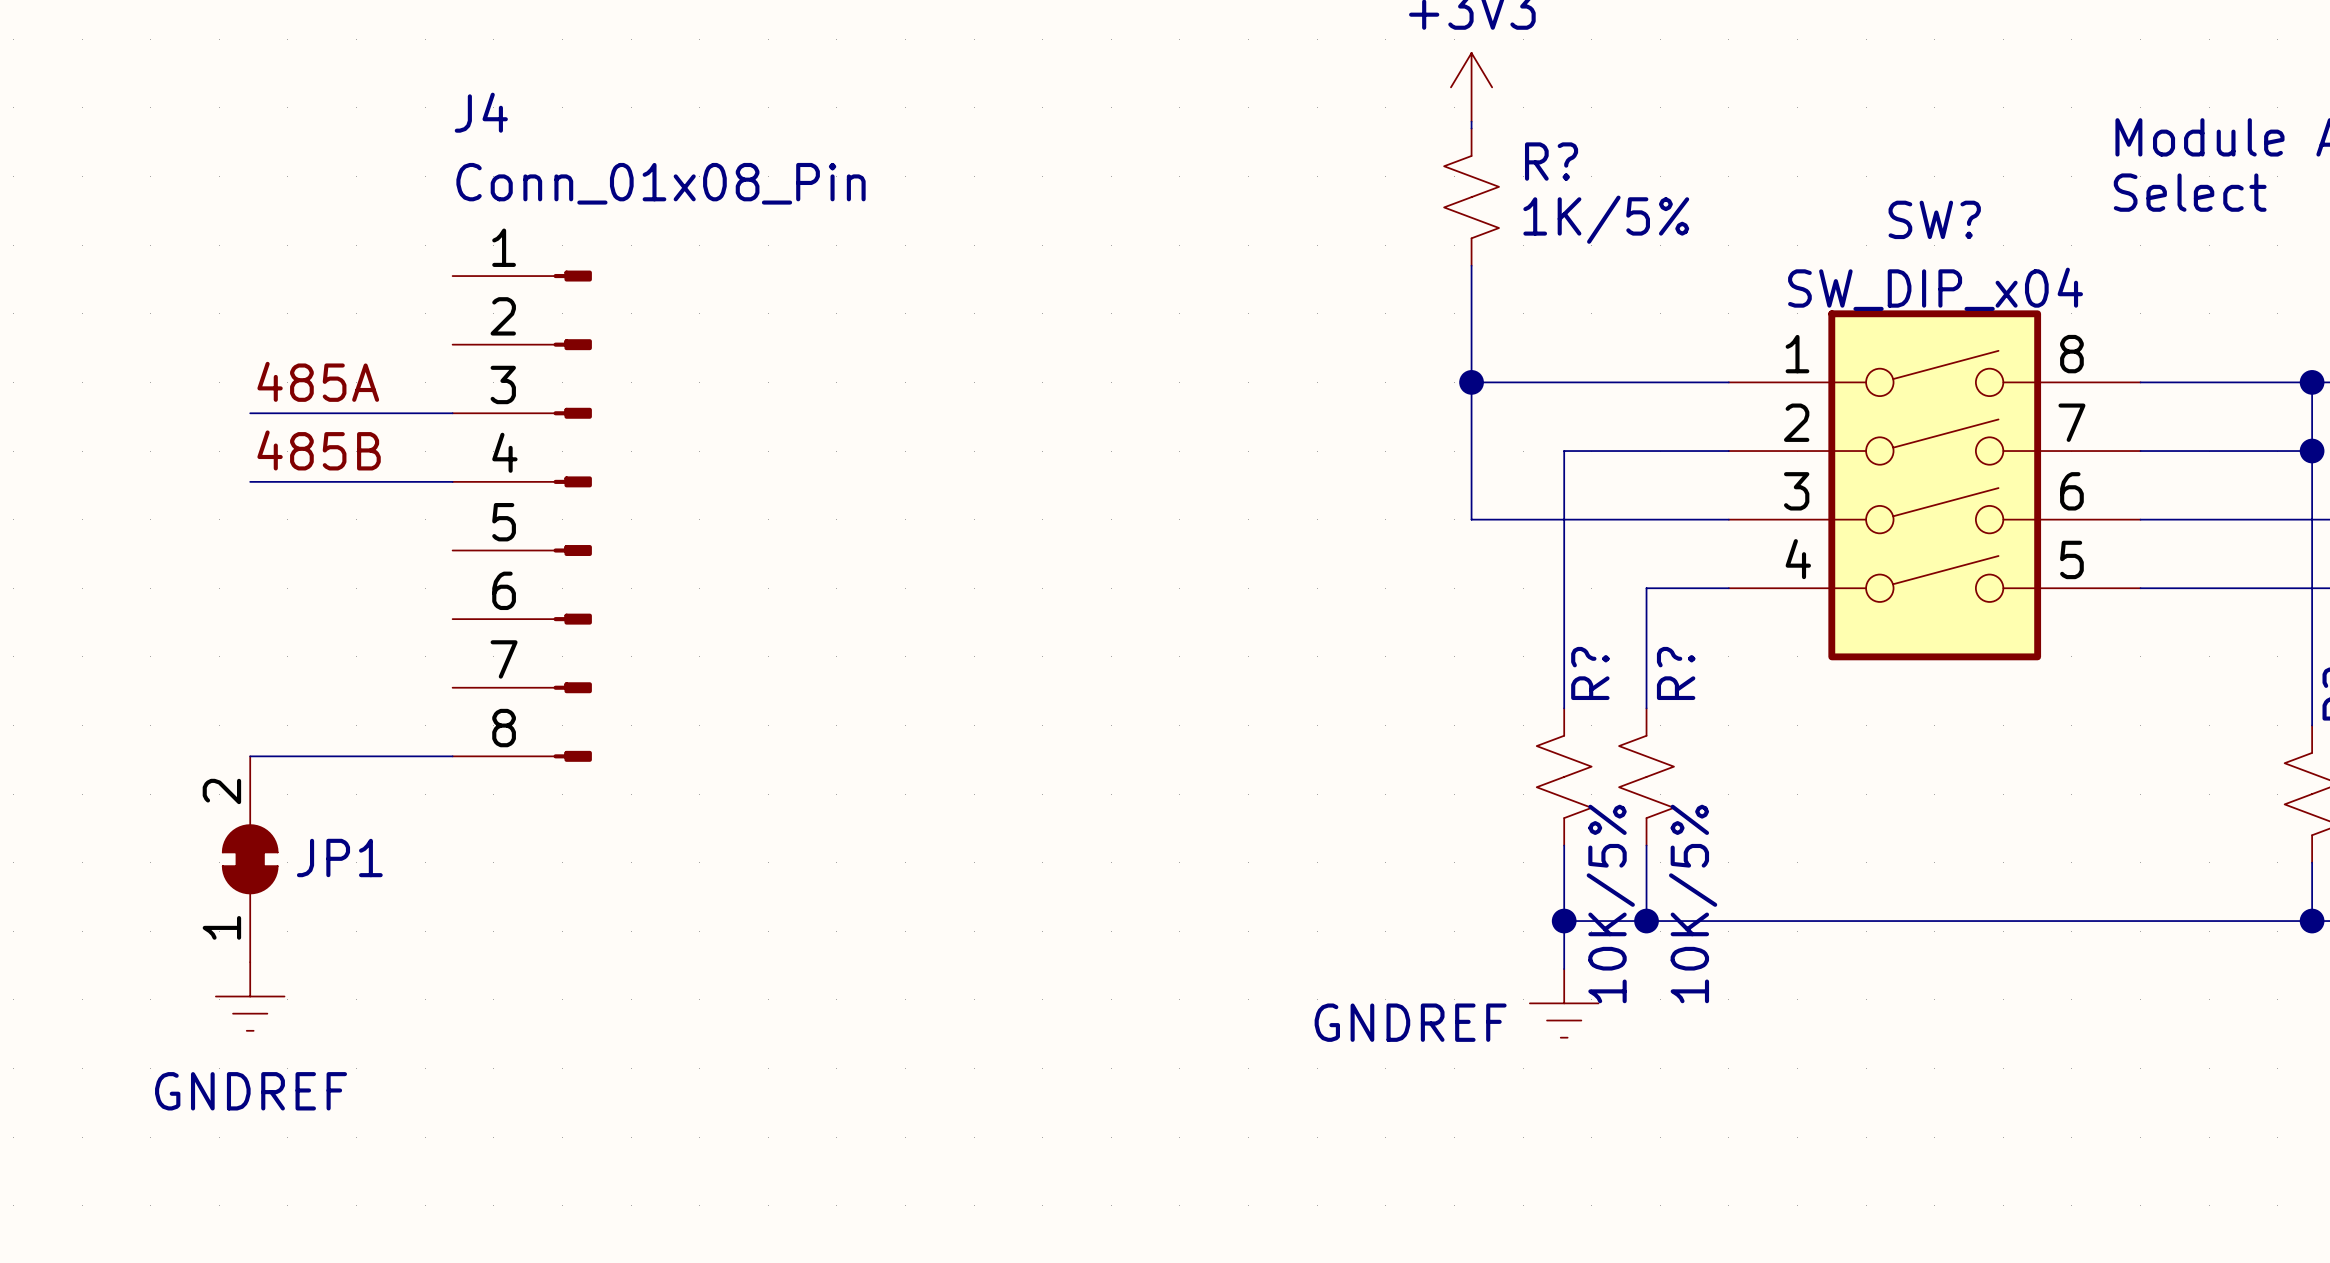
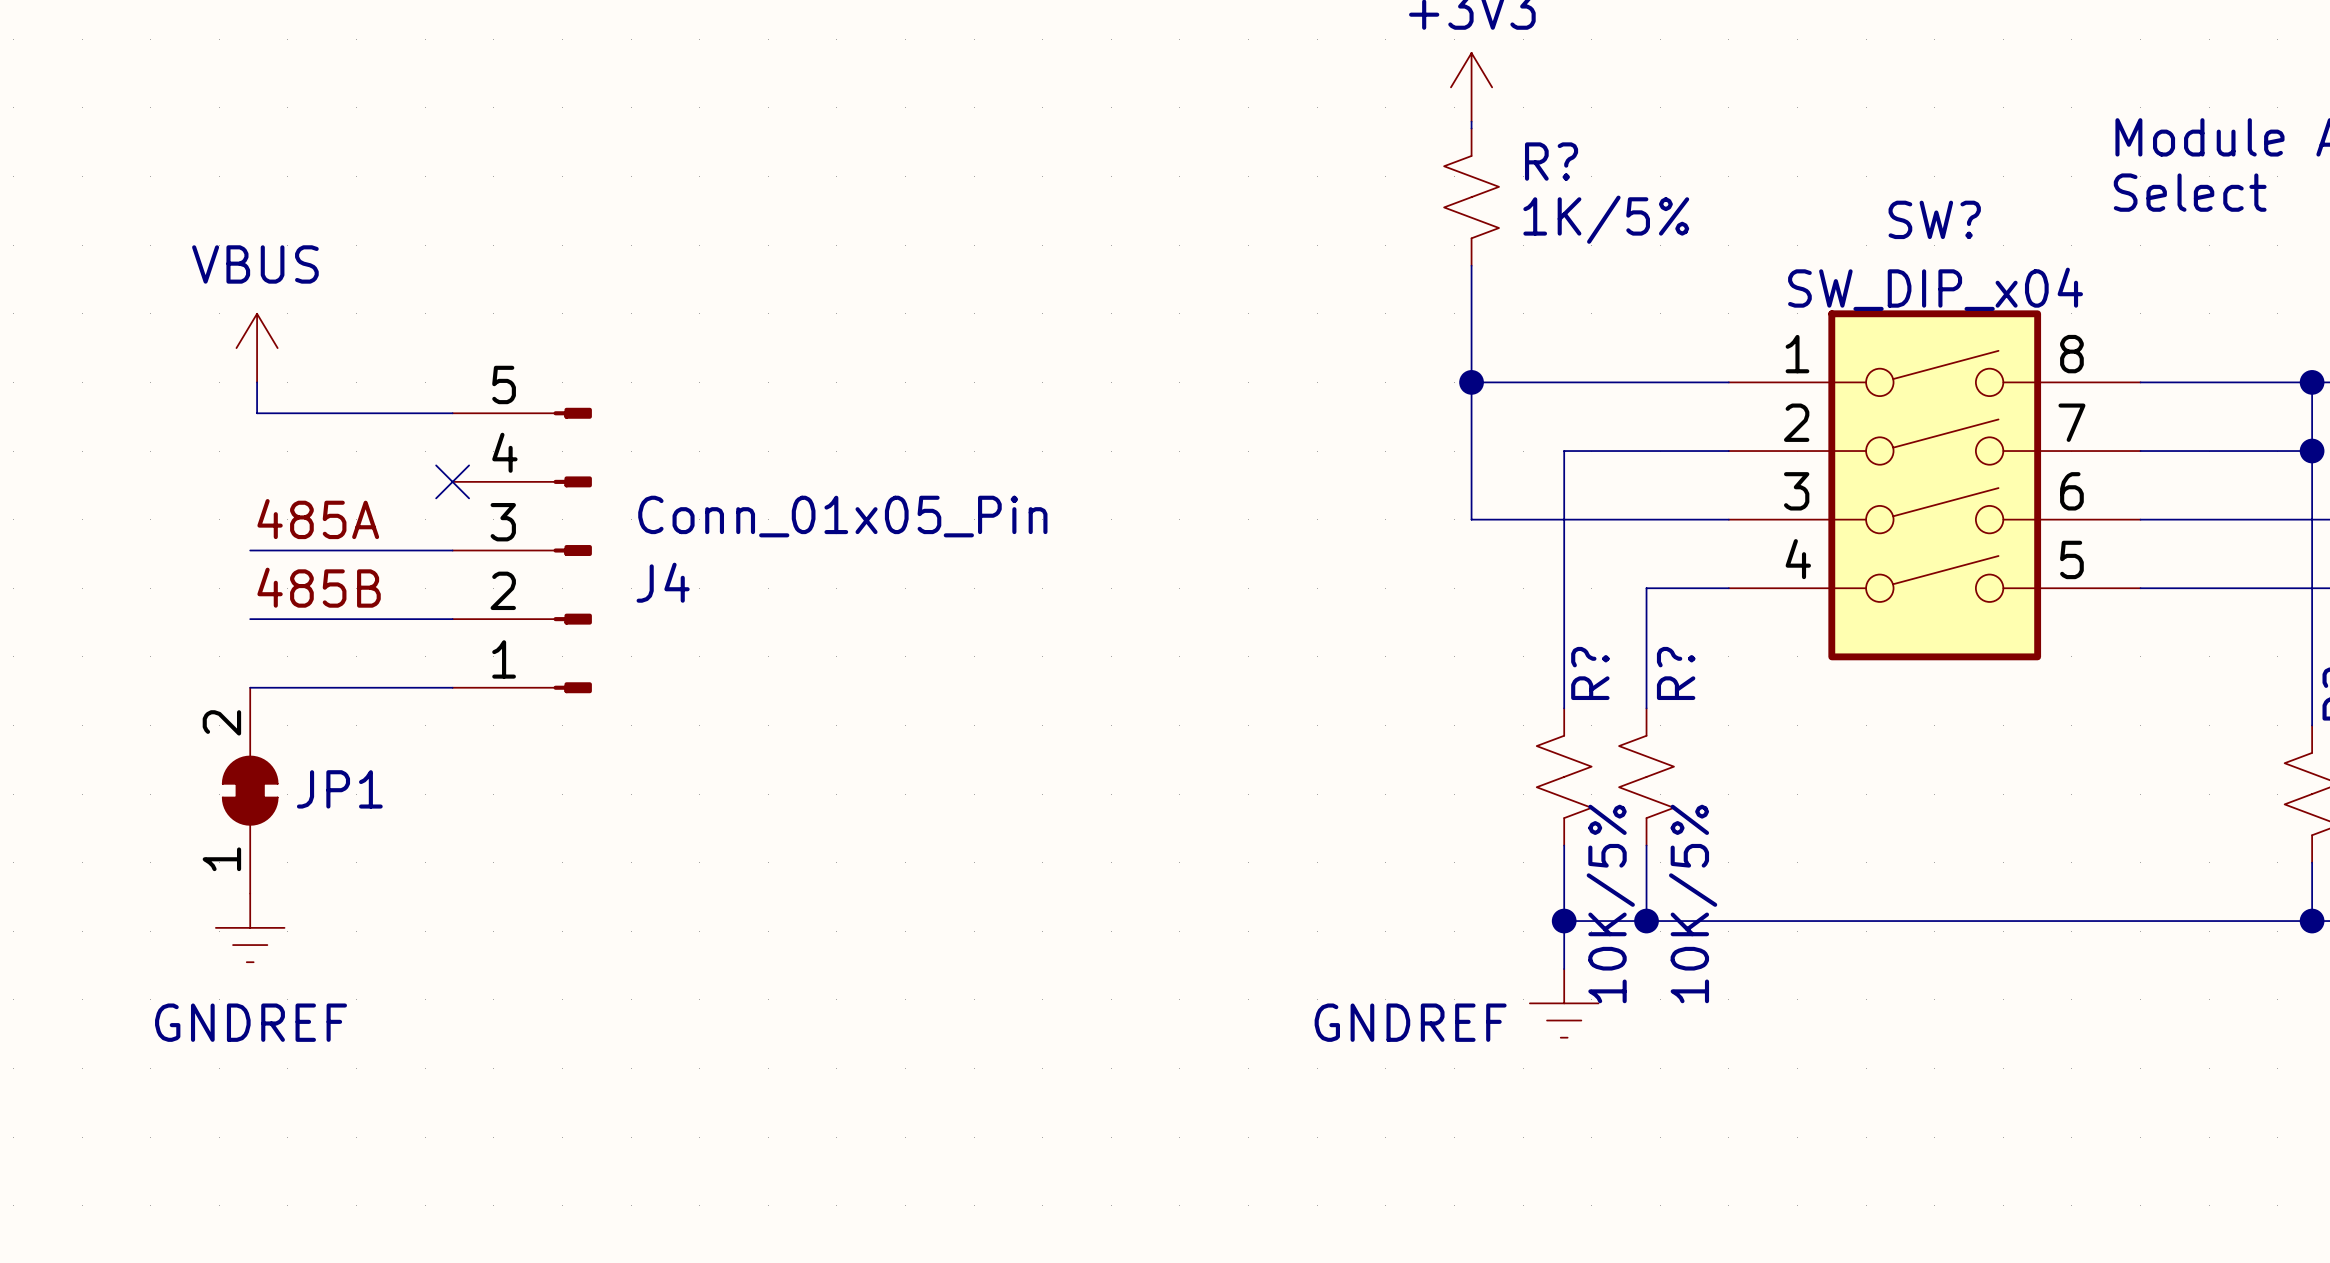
J4 name position: J4 (481, 112) -> J4 (663, 582)
J4 value: Conn_01x08_Pin (661, 183) -> Conn_01x05_Pin (842, 516)
J4 symbol: [452, 270, 592, 762] -> [452, 407, 592, 694]
power symbol: none -> VBUS (257, 348)
label position: 485A (318, 381) -> 485A (318, 519)
wire: (250, 413) (257, 413) -> (257, 382) (257, 413)
label position: 485B (319, 450) -> 485B (319, 587)
wire: (250, 481) (452, 481) -> (250, 550) (452, 550)
no-connect mark: none -> (452, 481)
wire: none -> (250, 619) (452, 619)
wire: (250, 756) (452, 756) -> (250, 687) (452, 687)
JP1 position: (250, 859) -> (250, 790)
power symbol position: GNDREF (250, 996) -> GNDREF (250, 927)

